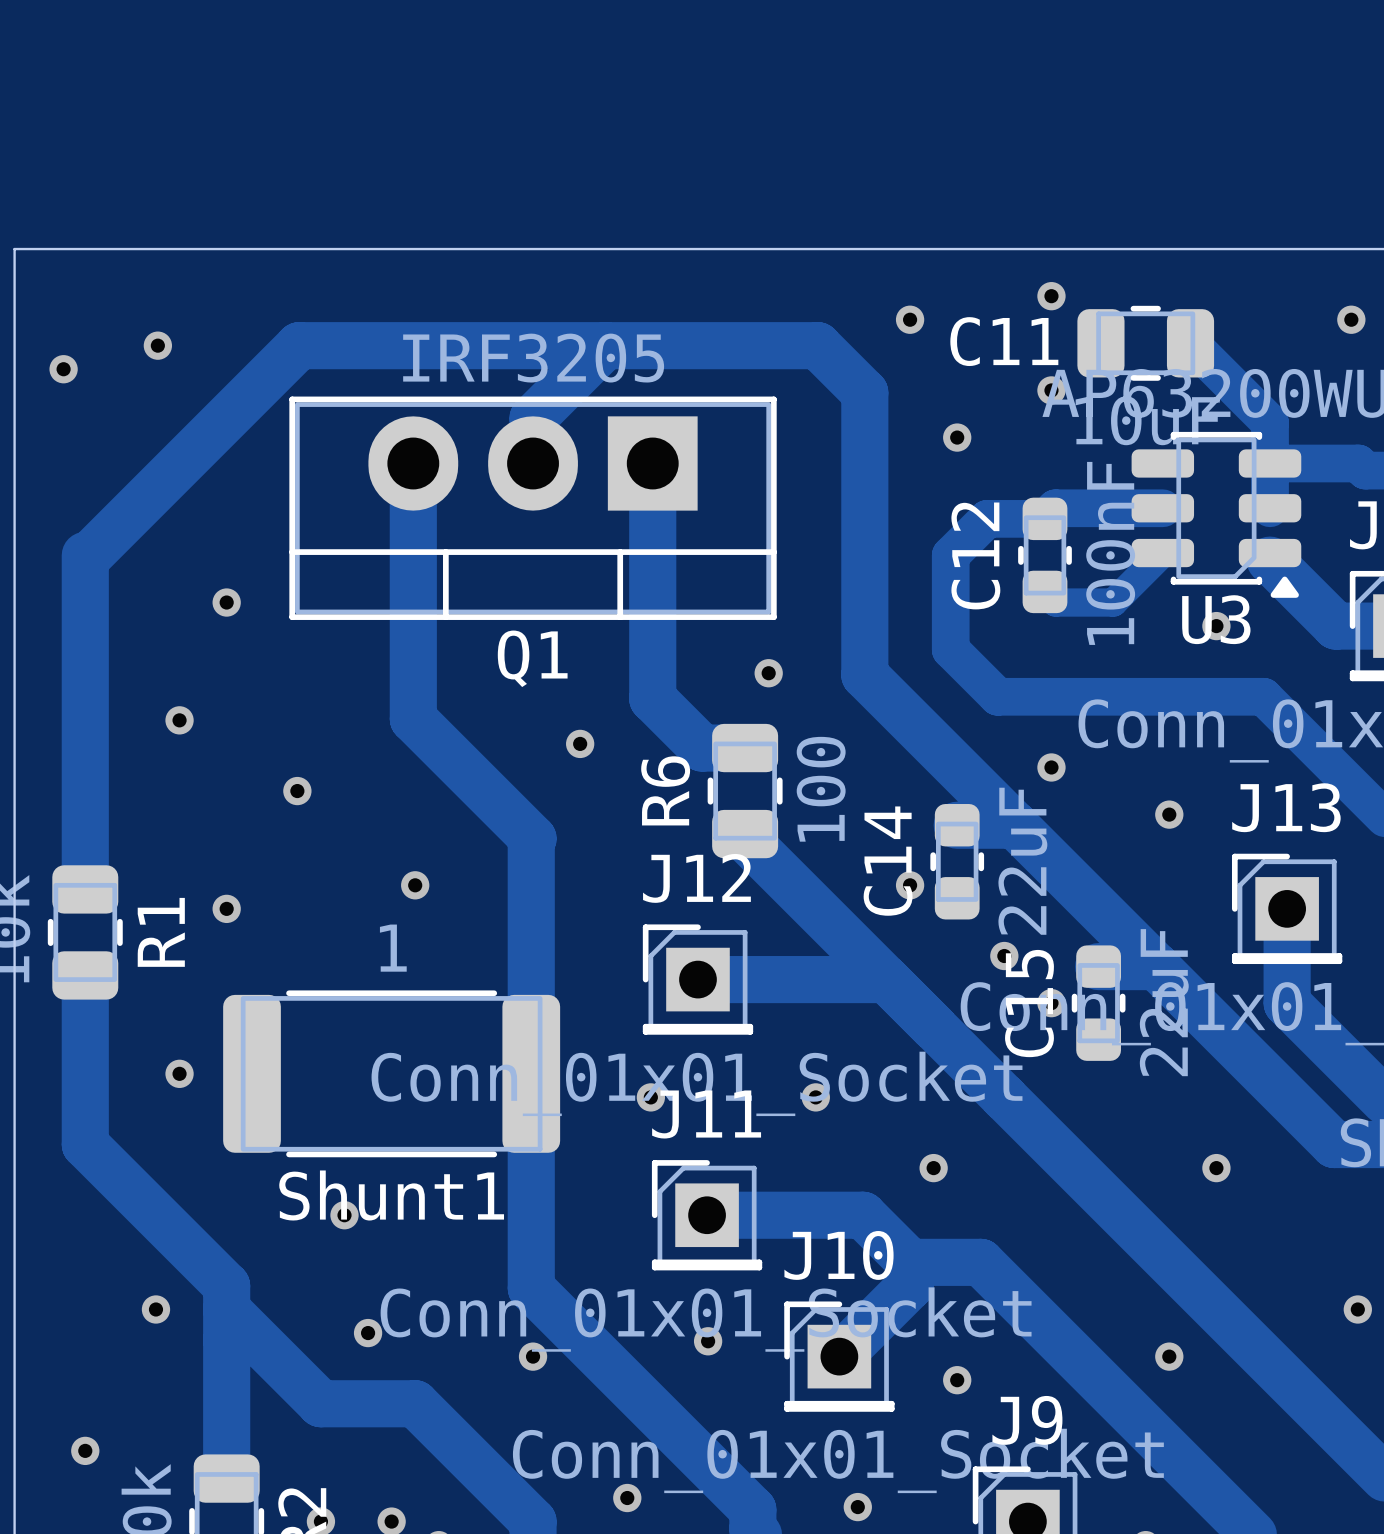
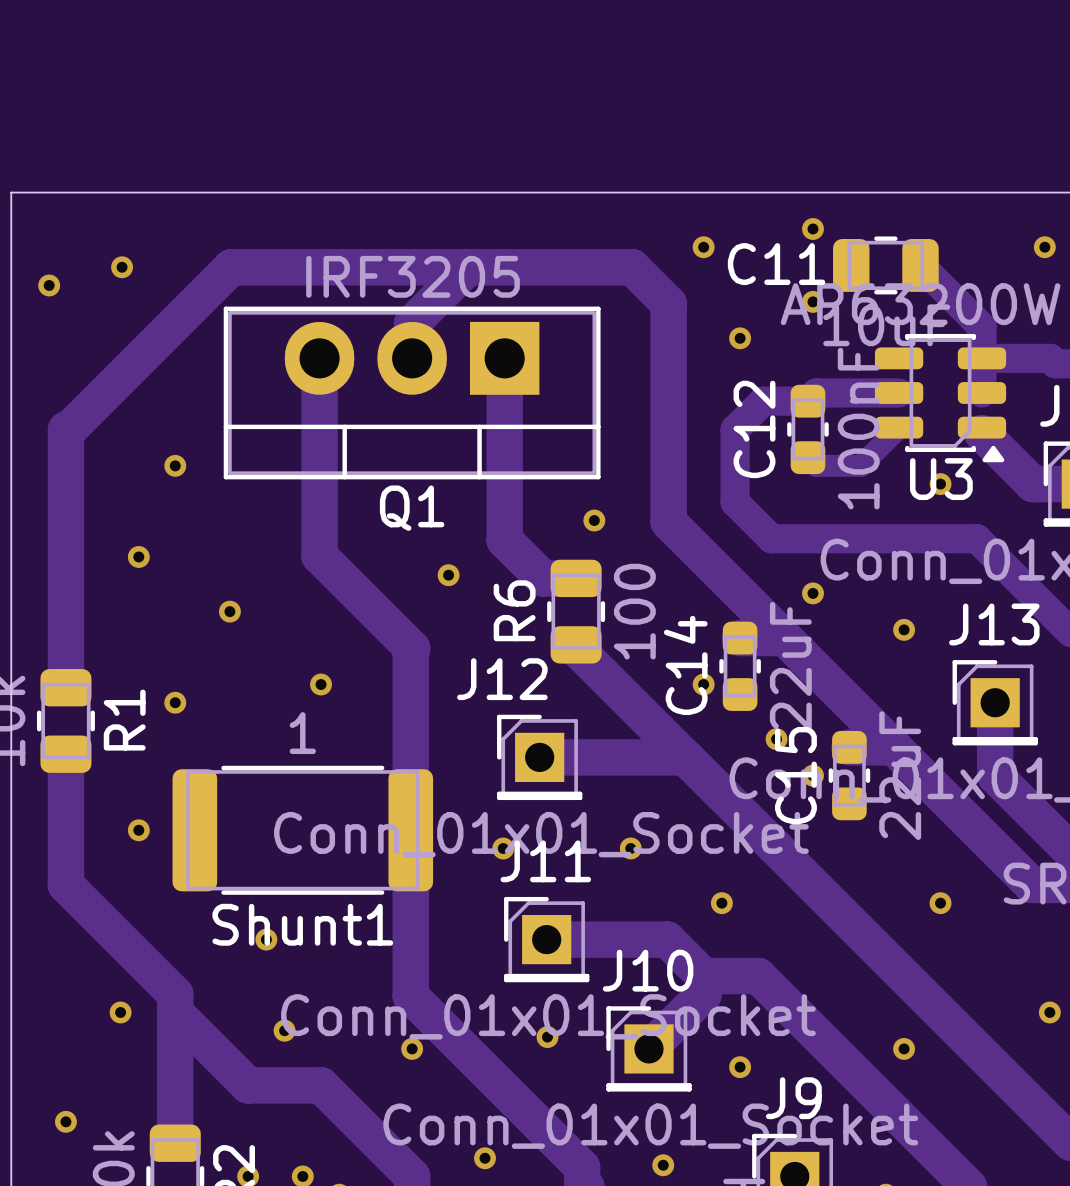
J12 name position: J12 (696, 878) -> J12 (502, 679)

